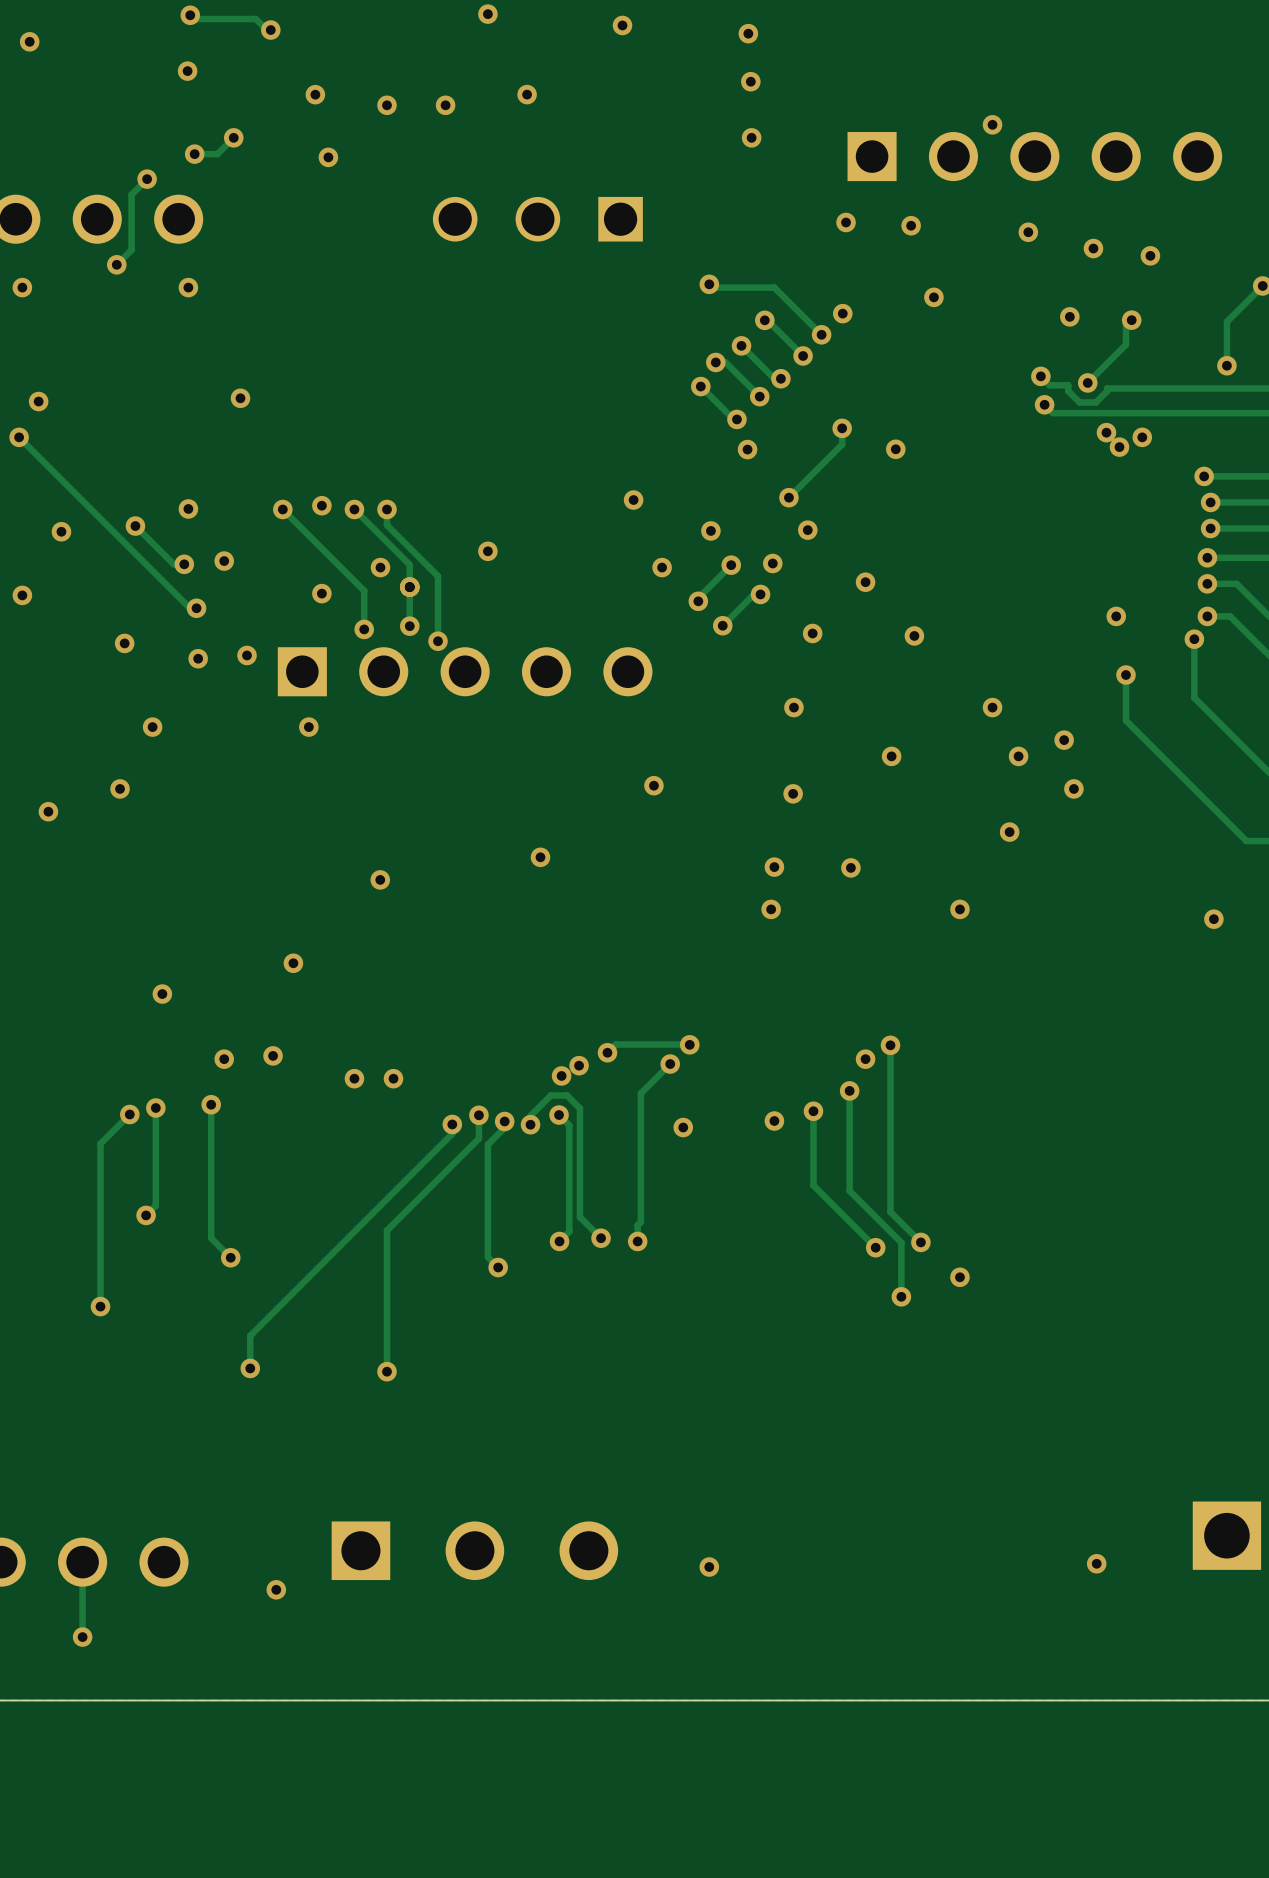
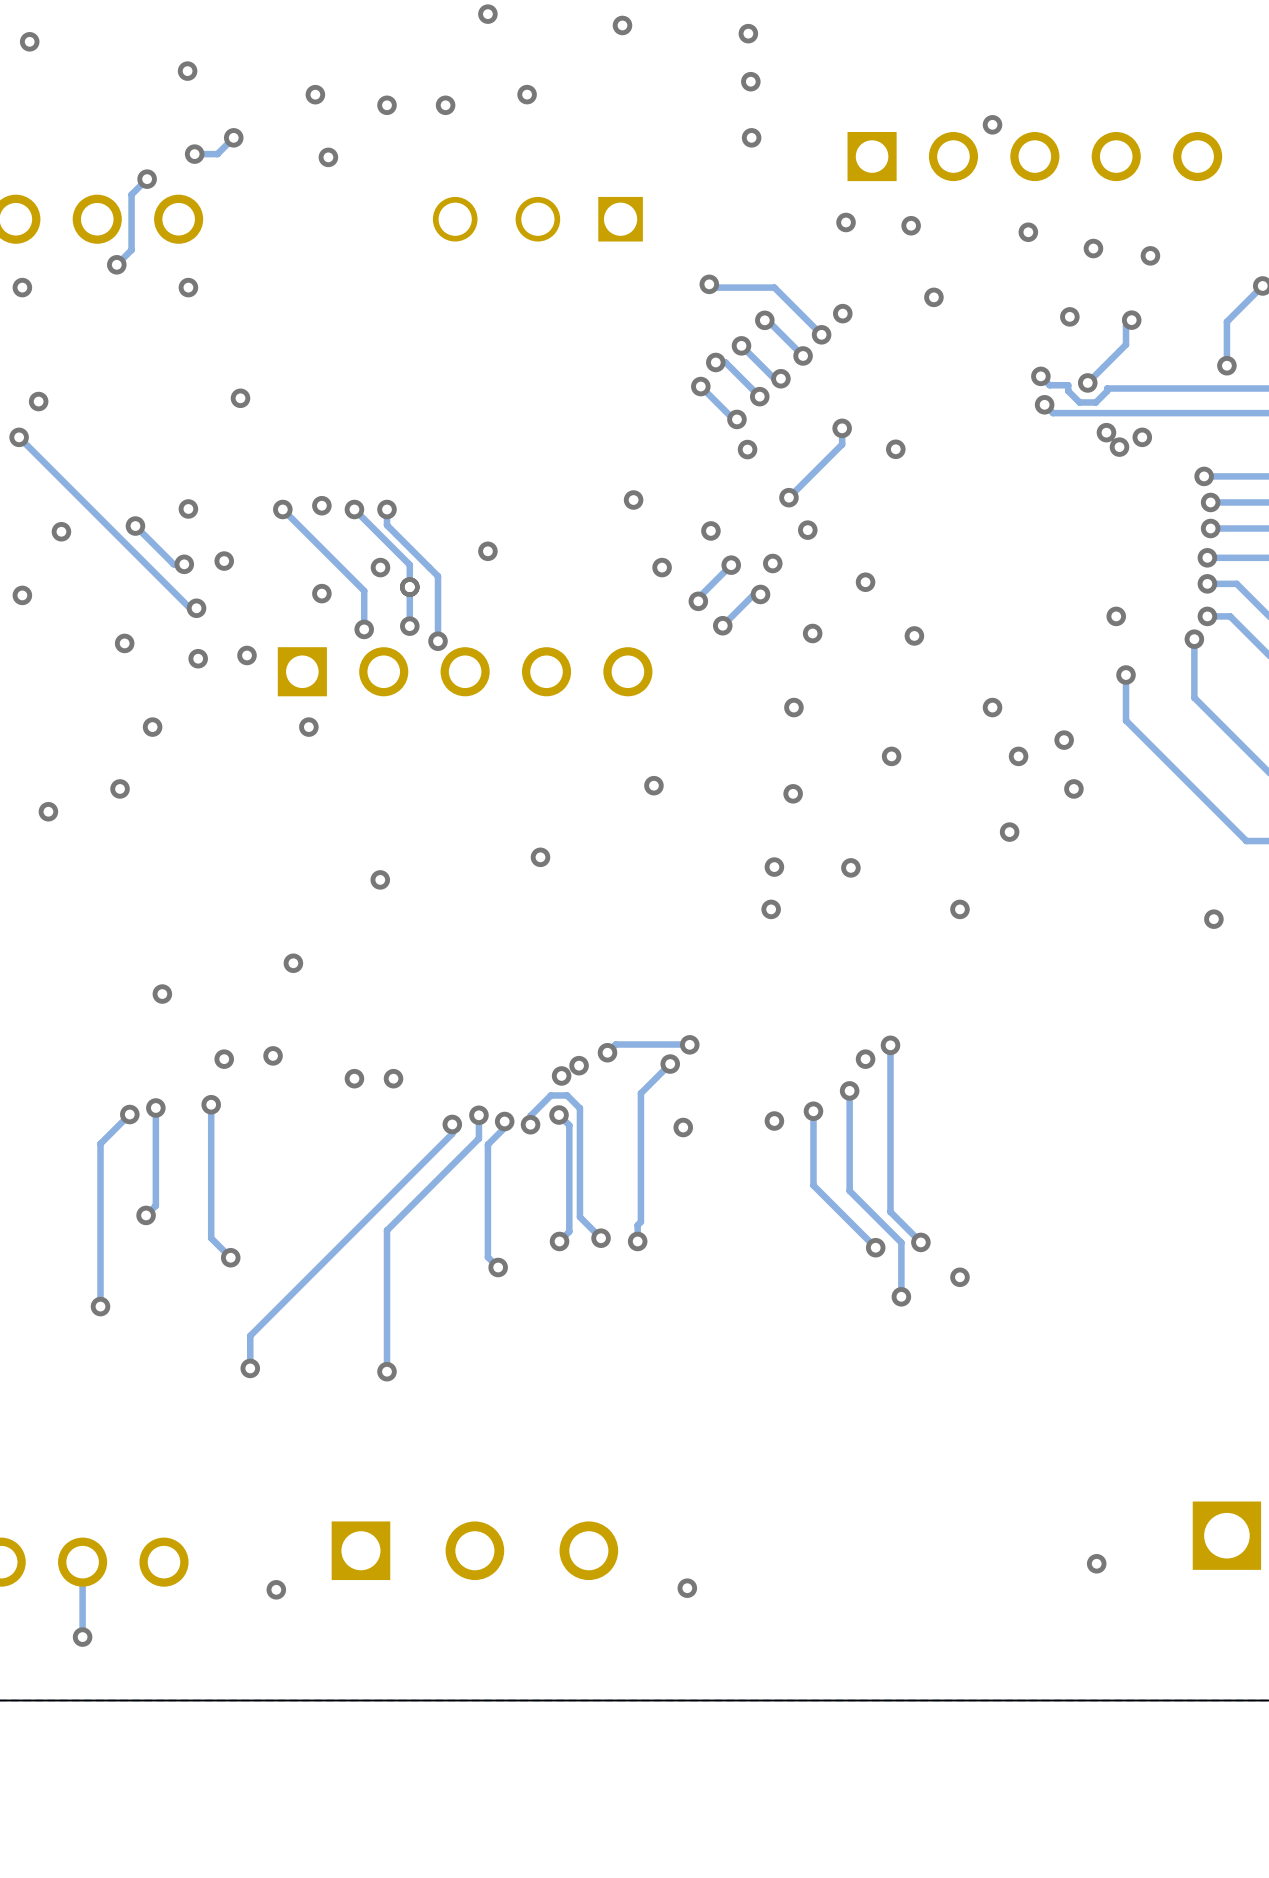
track: (190, 15) (194, 19) (255, 19) (266, 30) (270, 30) -> none
via: (190, 15) -> none
via: (270, 30) -> none
via position: (709, 1567) -> (687, 1588)

